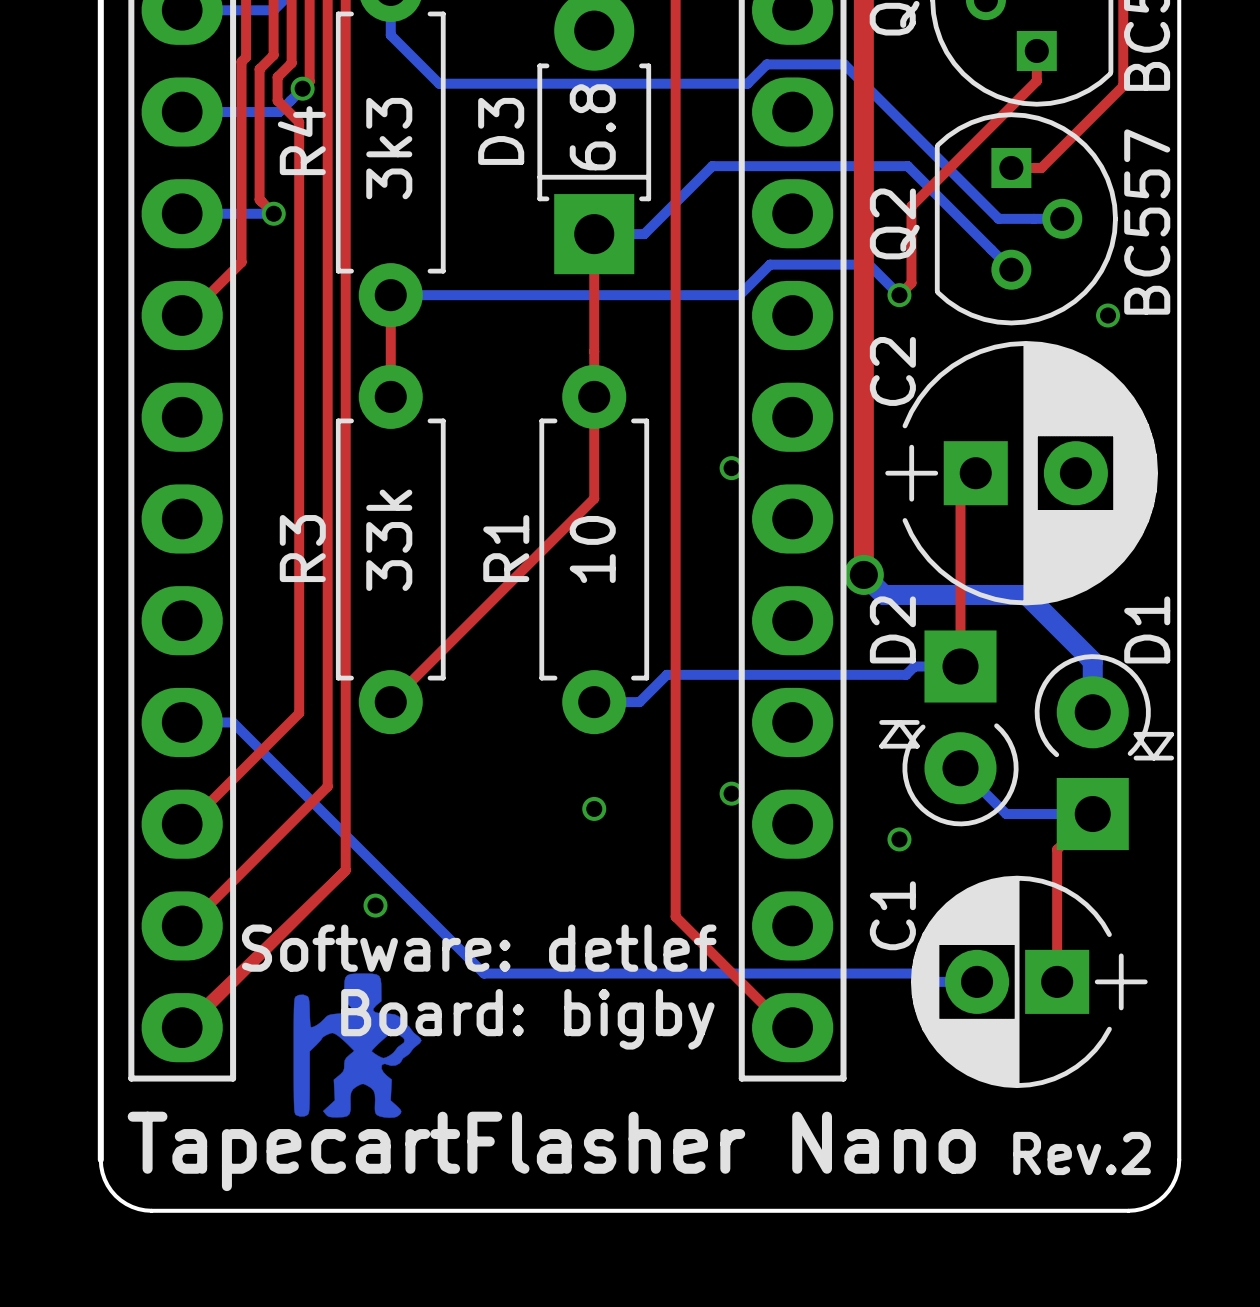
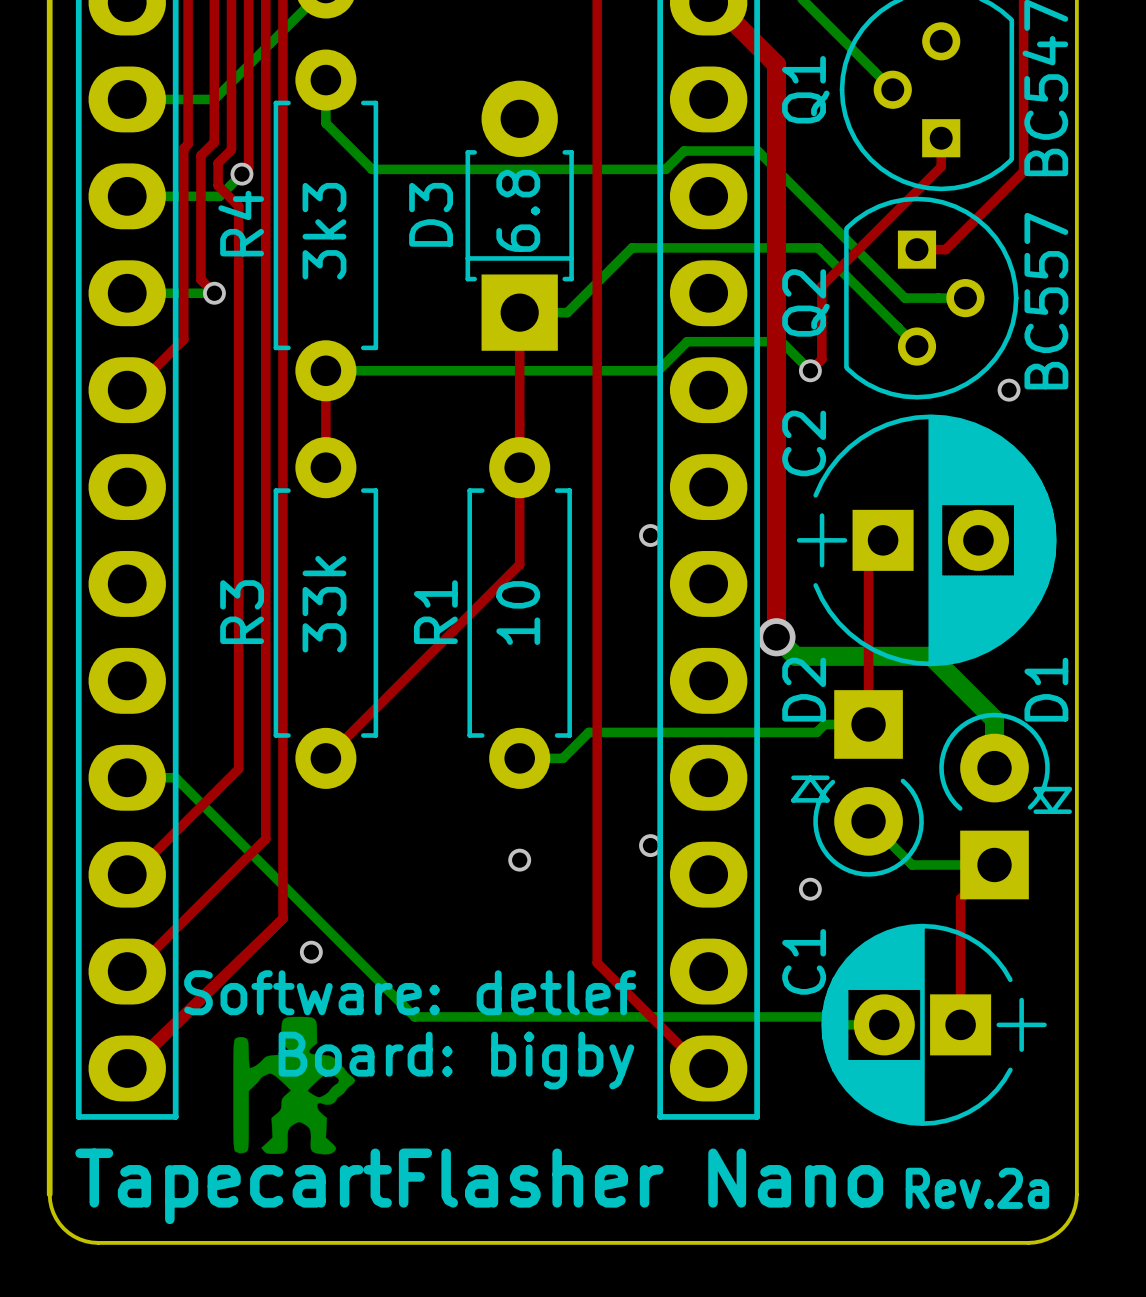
text: Rev.2 (1082, 1153) -> Rev.2a (977, 1188)

